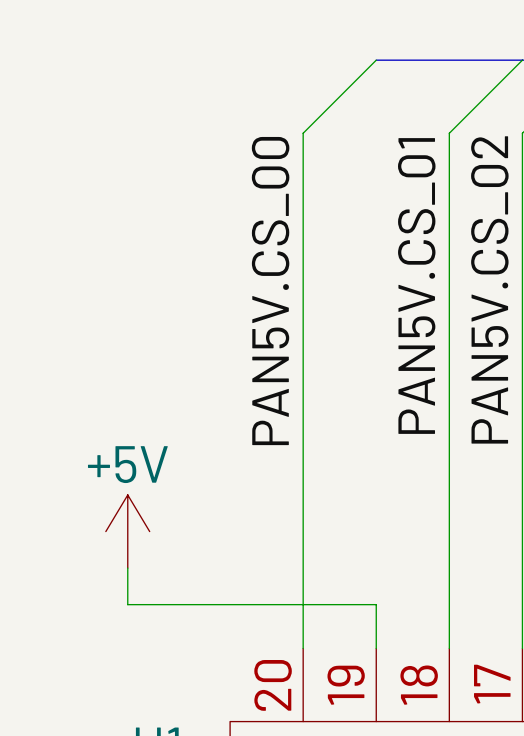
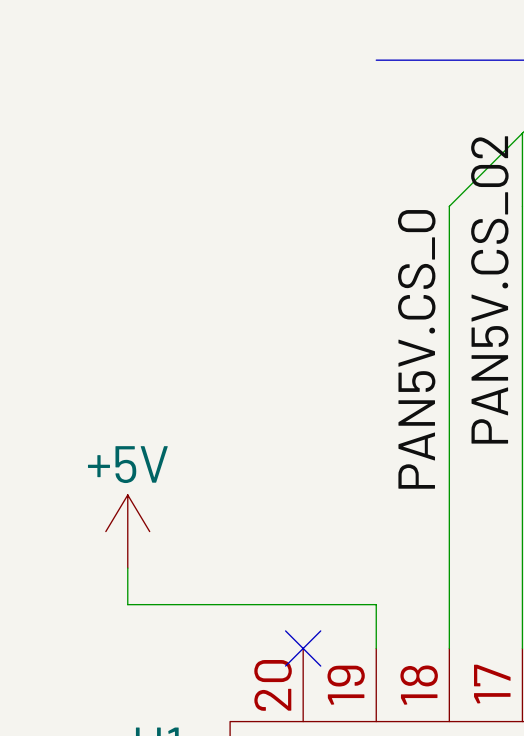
wire: (376, 60) (303, 133) (303, 648) -> none
wire: (522, 60) (449, 133) (449, 206) -> (522, 133) (449, 206)
label: PAN5V.CS_01 (416, 285) -> PAN5V.CS_0 (416, 349)
label: PAN5V.CS_00 (270, 291) -> none
no-connect mark: none -> (303, 648)

